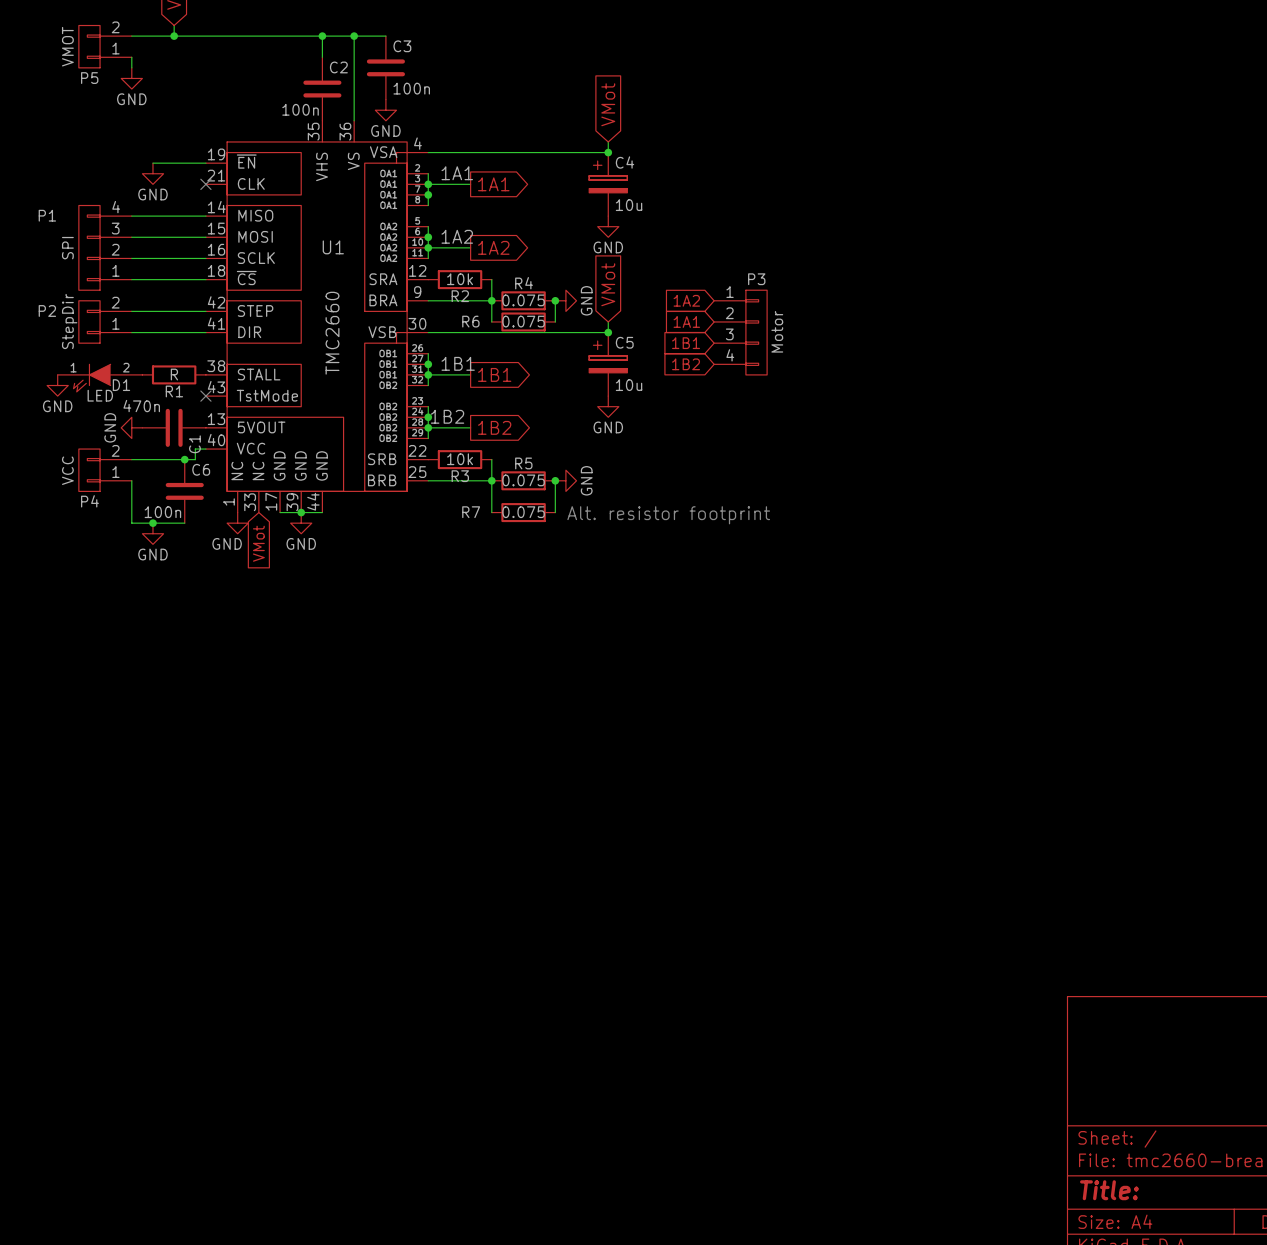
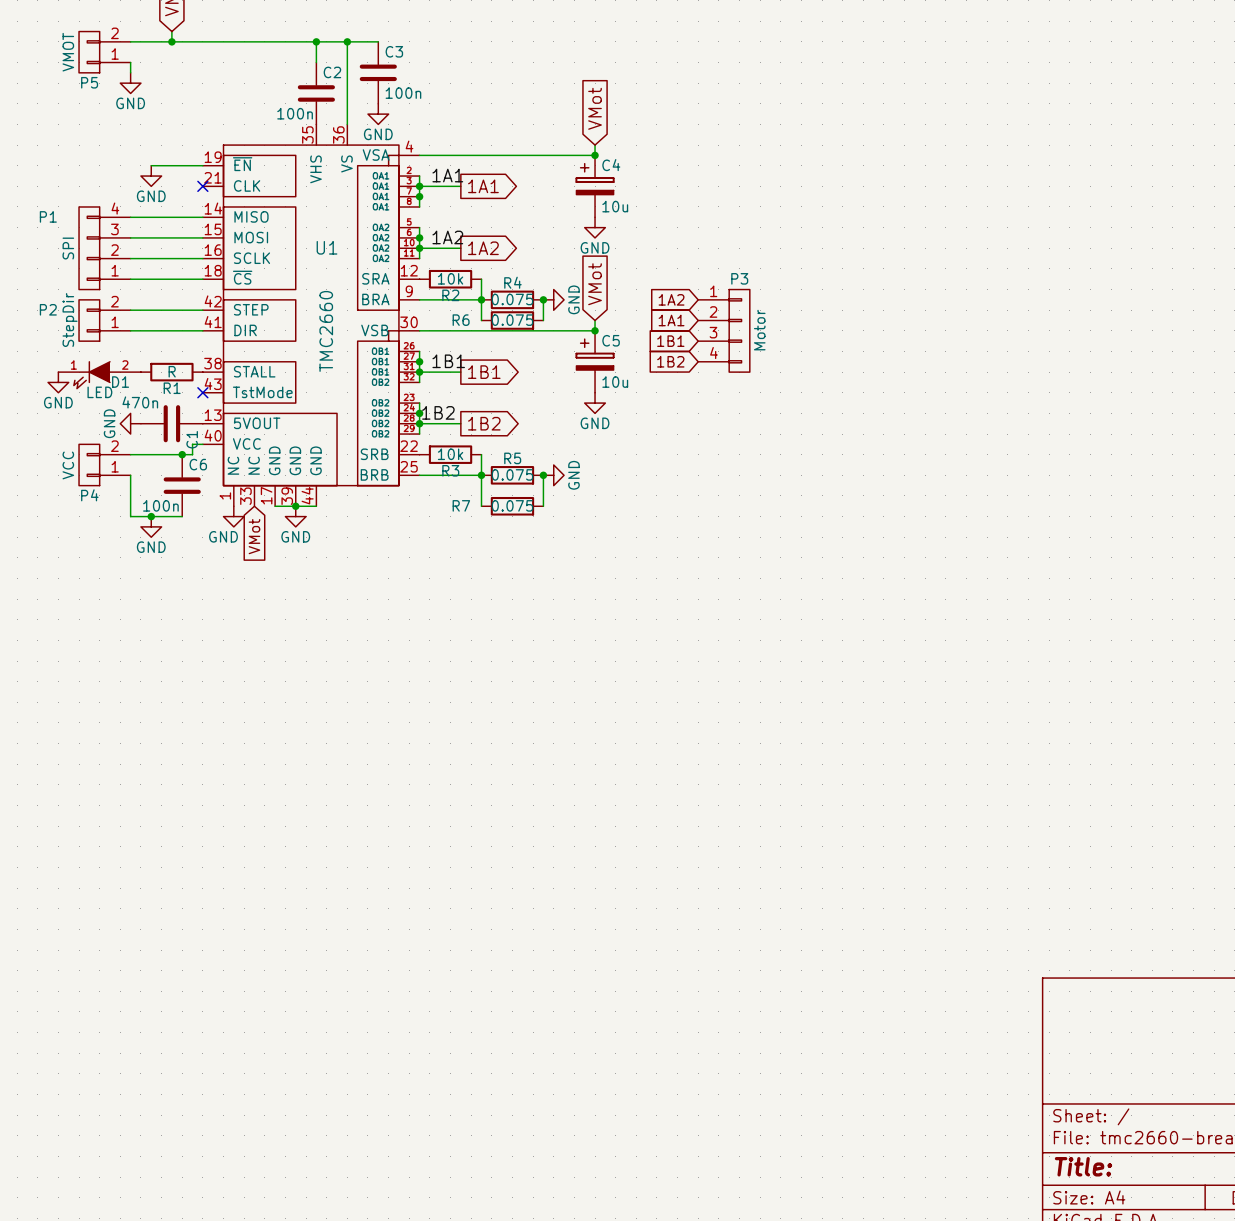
text: Alt. resistor footprint (668, 515) -> none

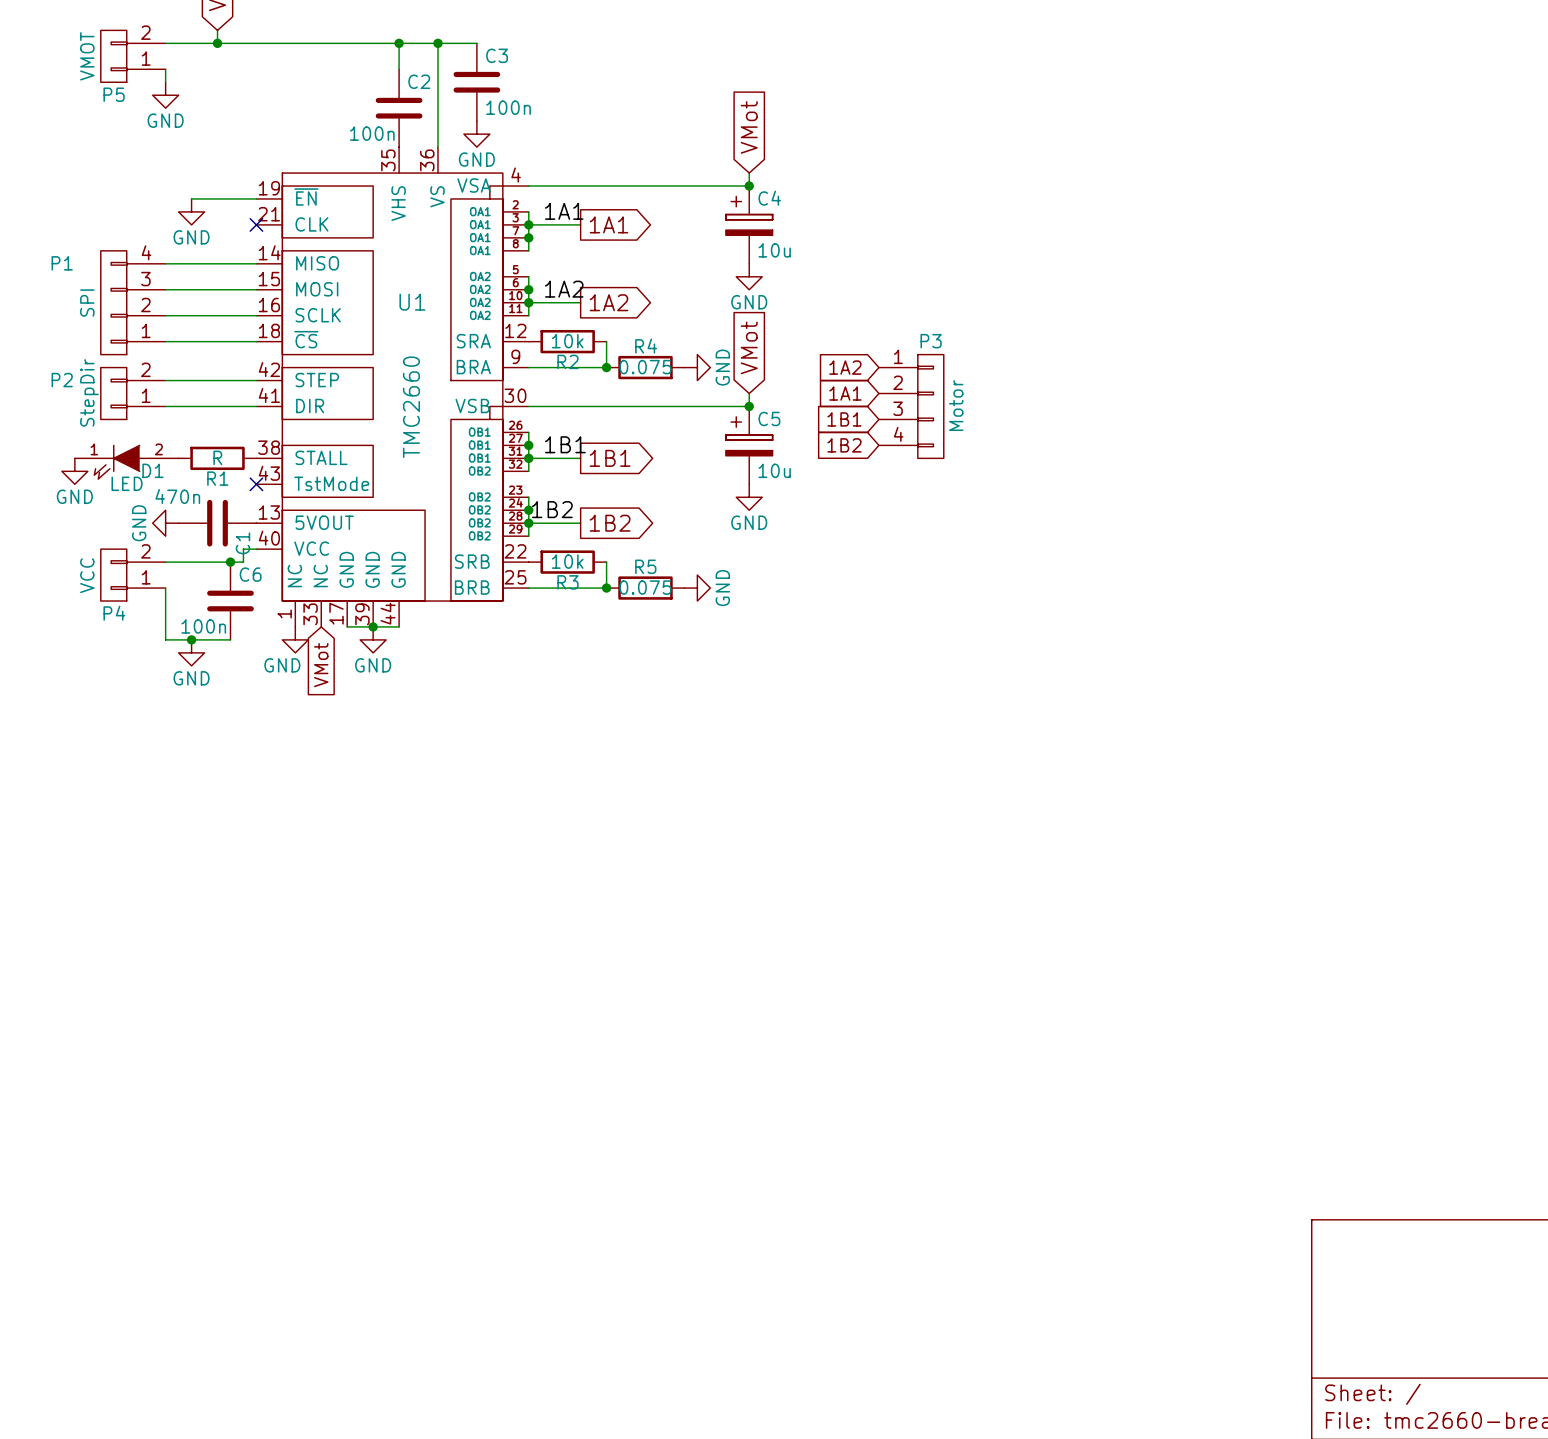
wire: (481, 299) (481, 320) -> none
wire: (543, 299) (543, 320) -> none
junction: (543, 299) -> none
R6: 0.075 (512, 320) -> none
wire: (481, 475) (481, 506) -> none
wire: (543, 475) (543, 506) -> none
junction: (543, 475) -> none
R7: 0.075 (512, 506) -> none

